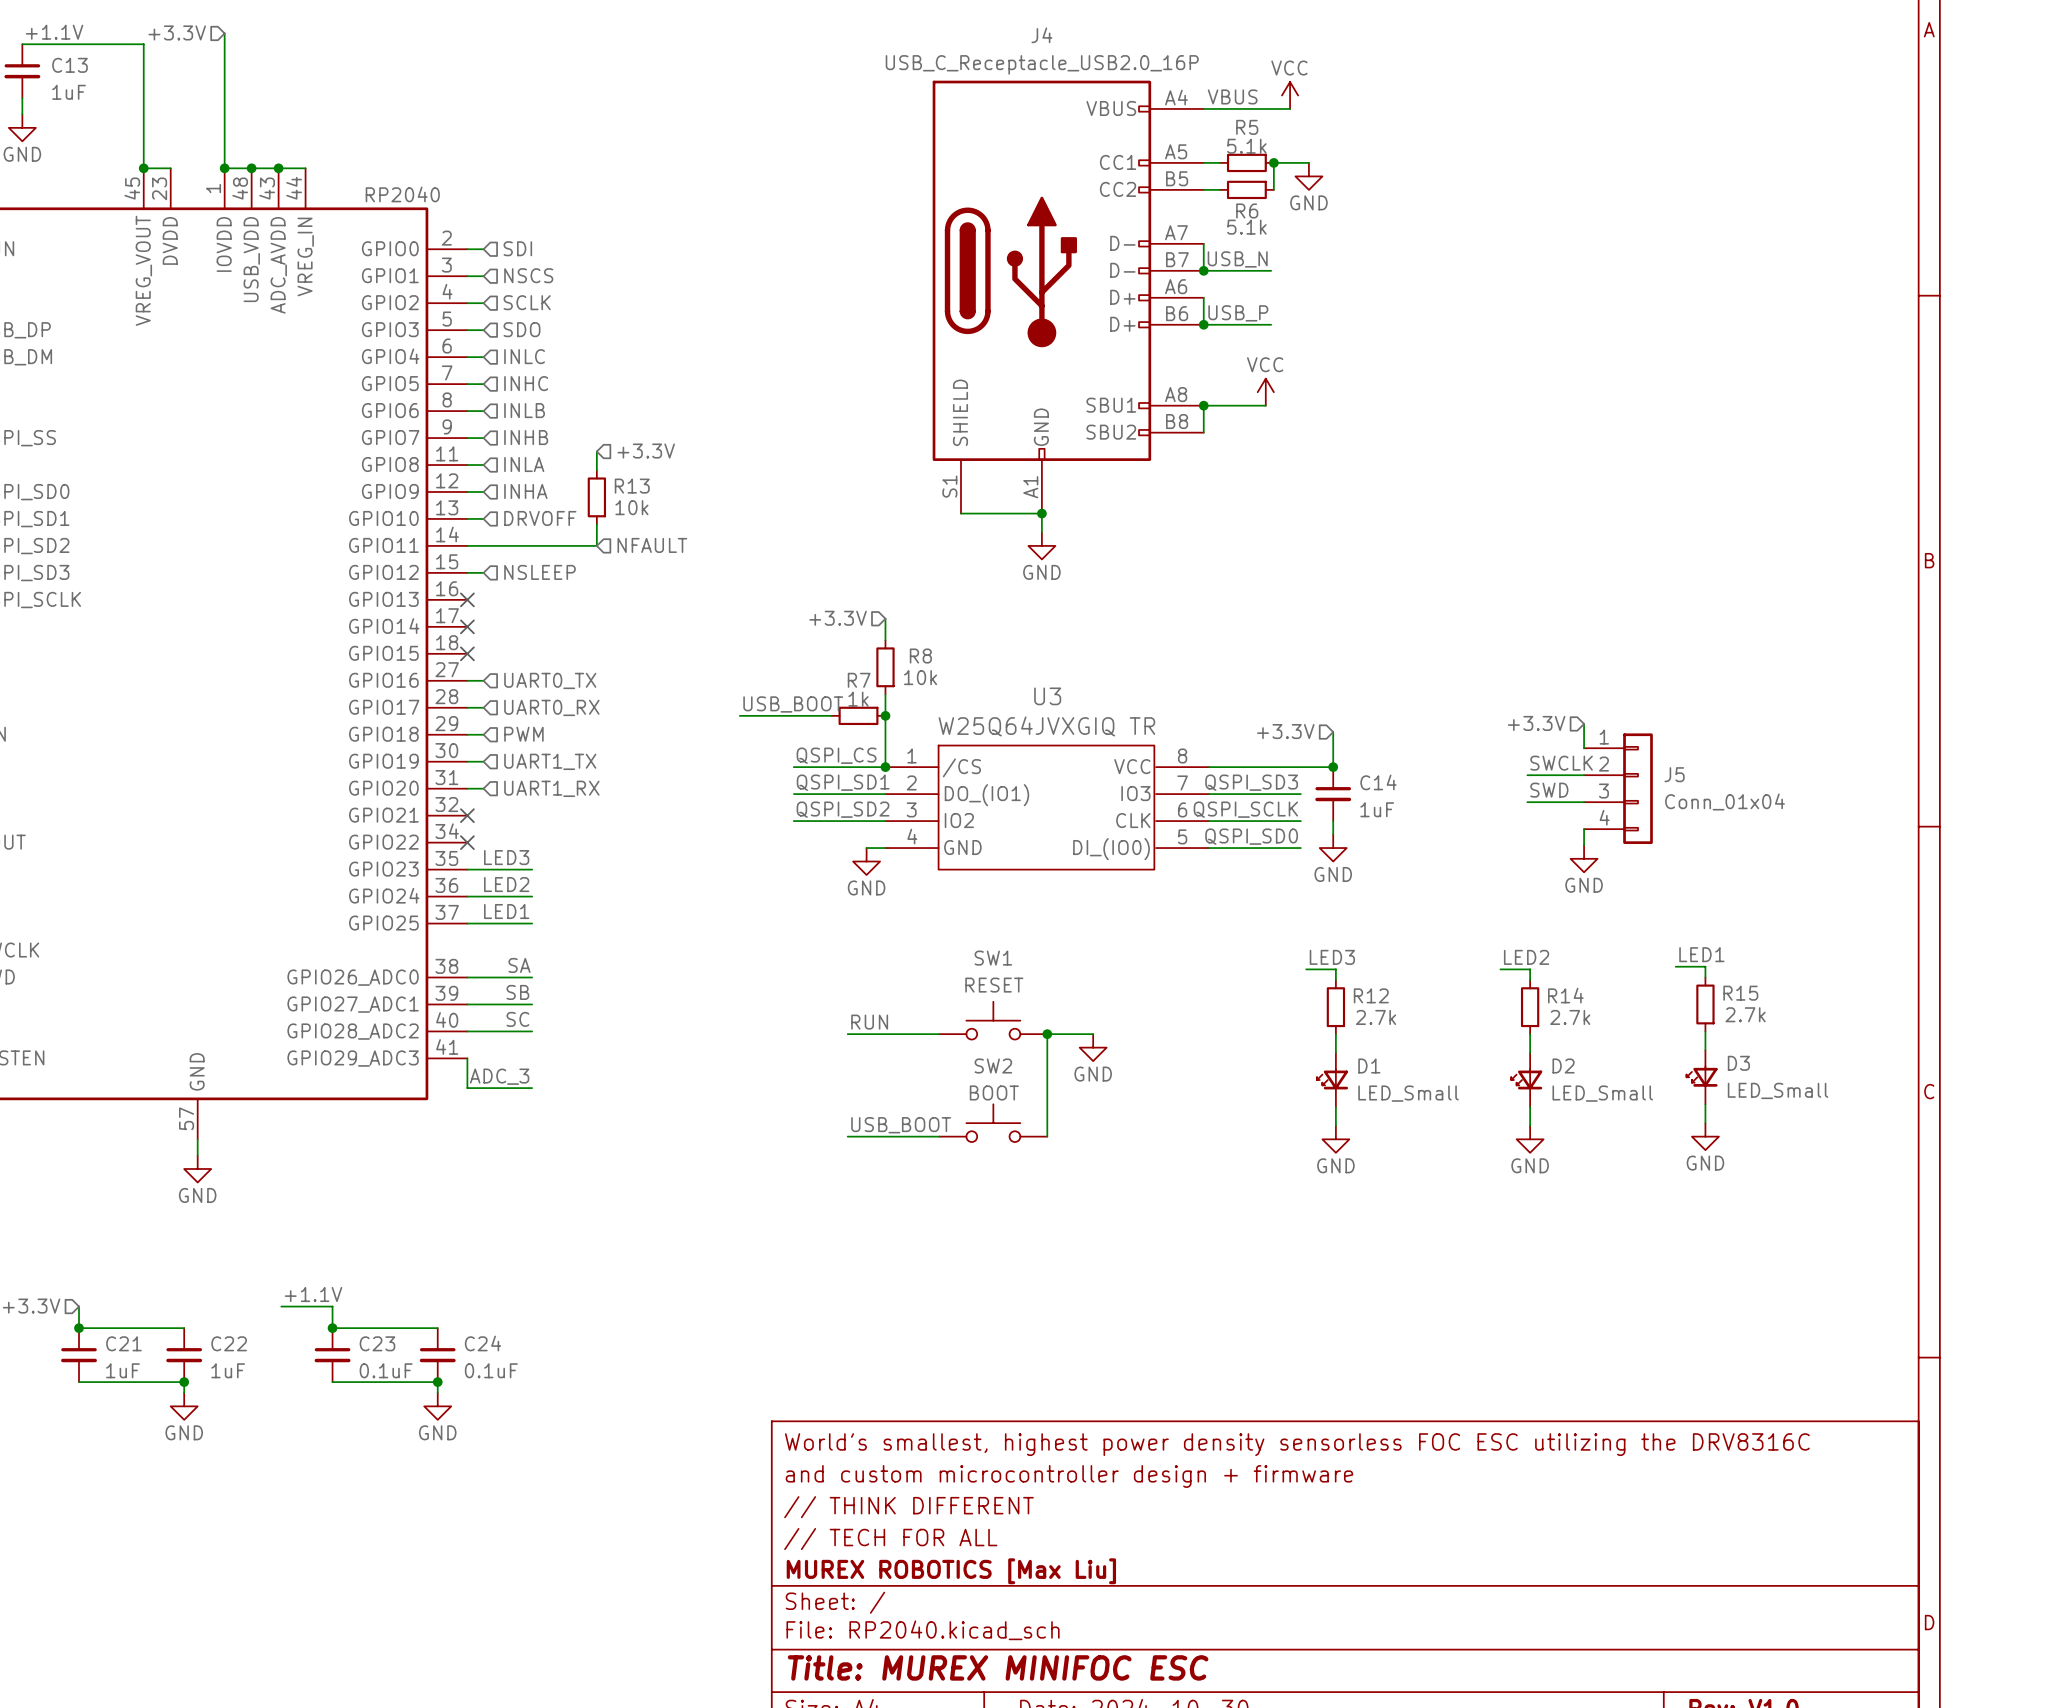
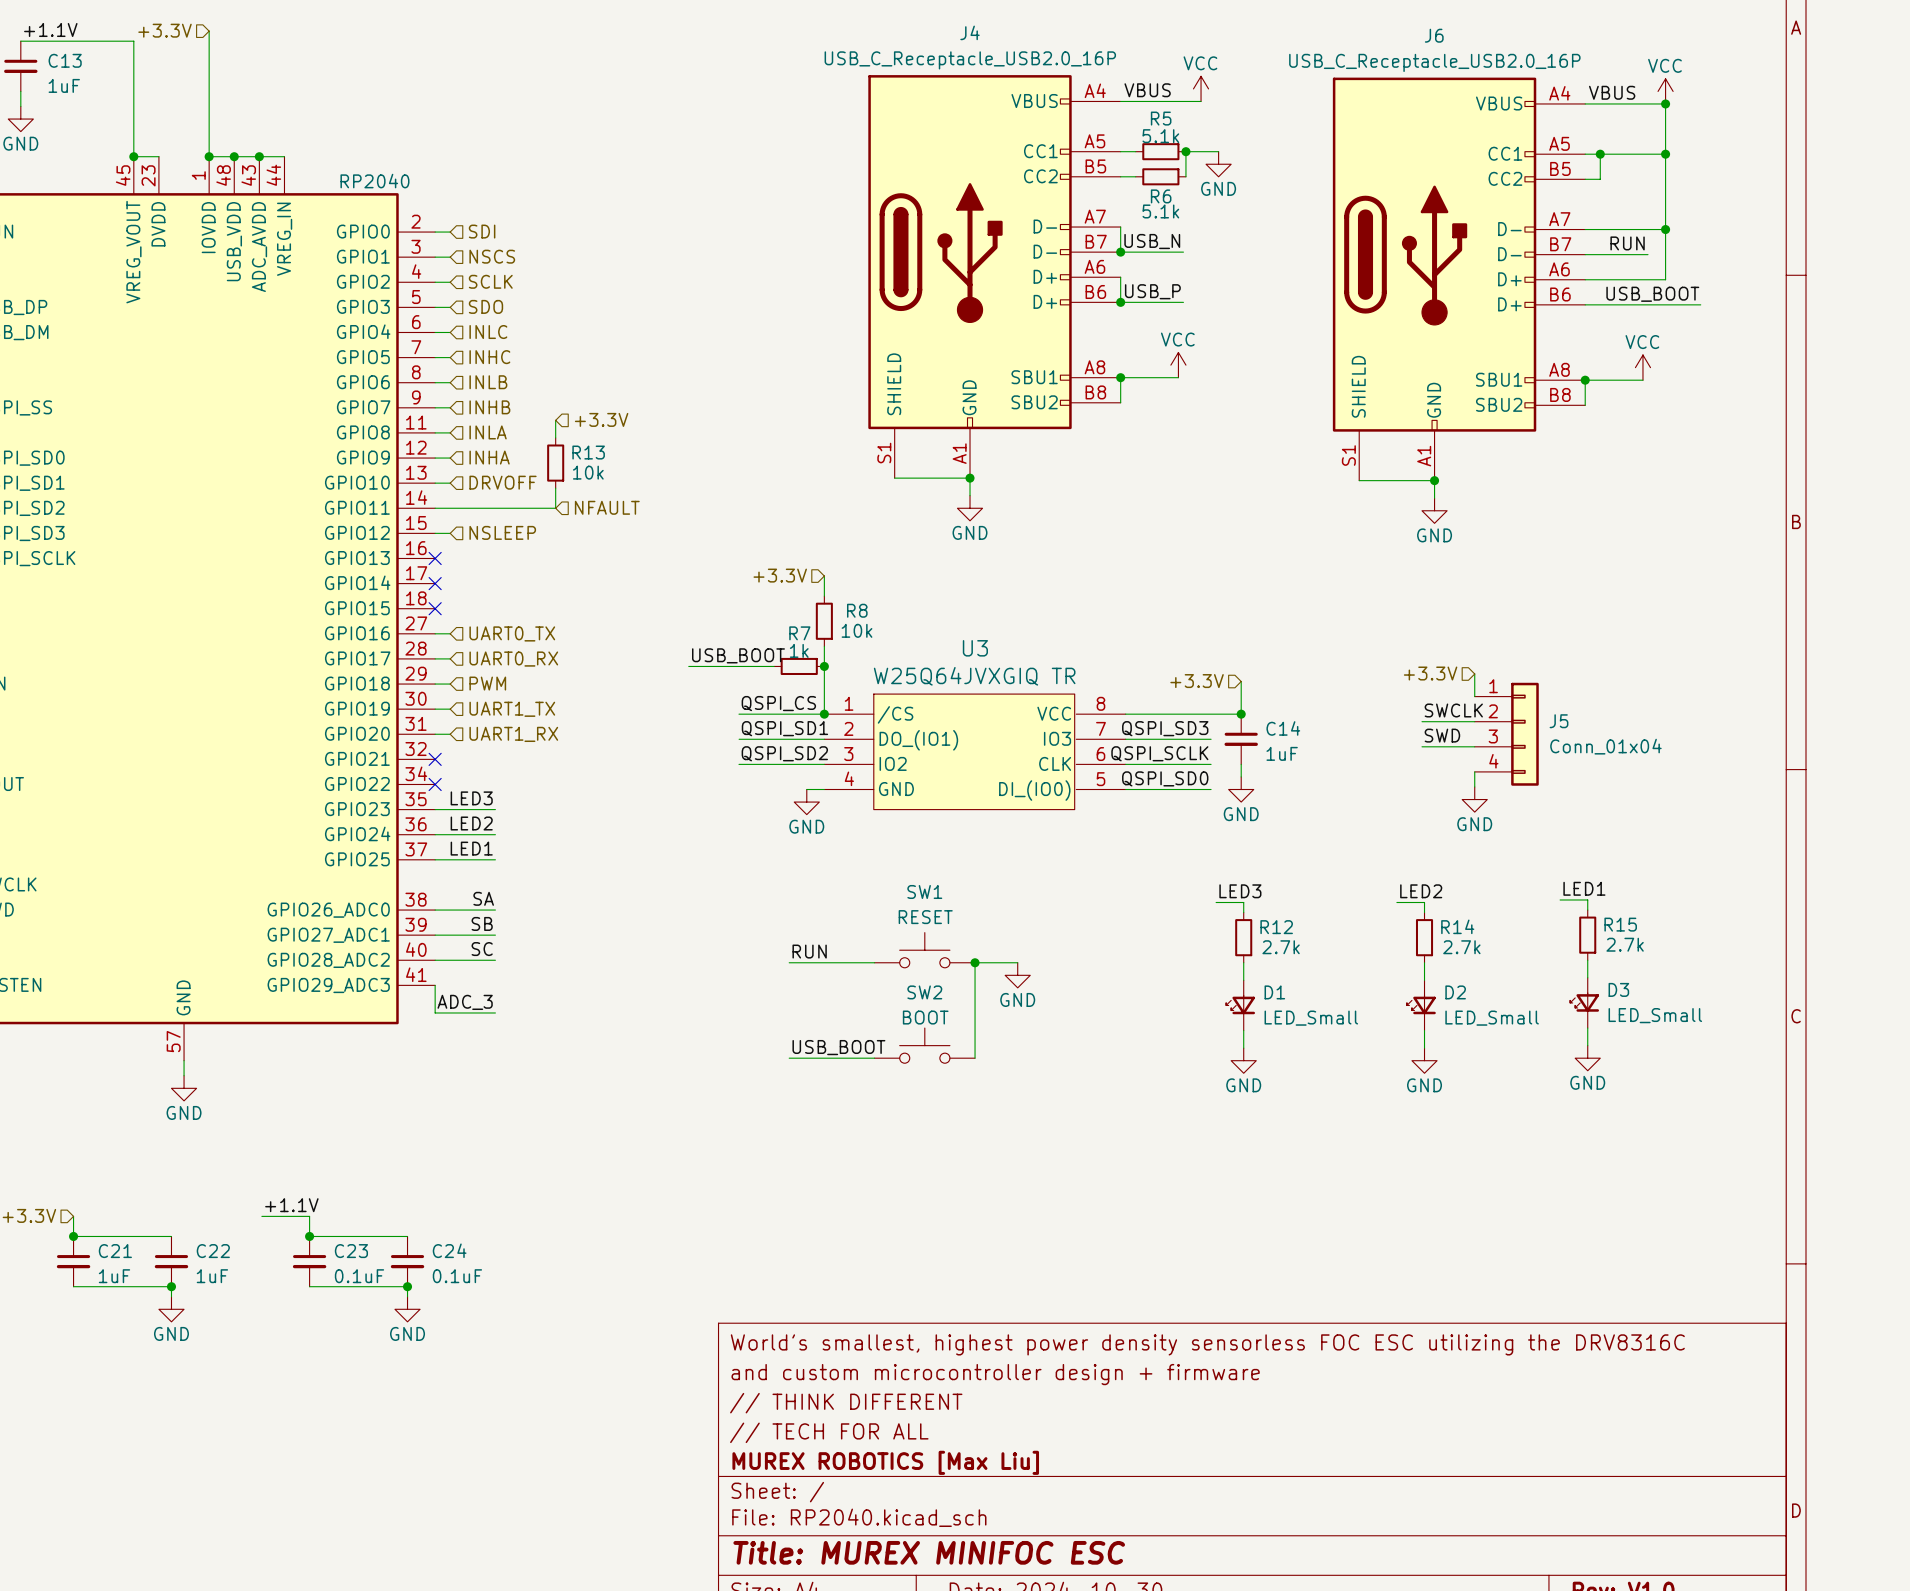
power symbol: none -> VCC (1665, 91)
label: none -> VBUS (1612, 92)
wire: none -> (1585, 103) (1665, 103) (1665, 279) (1585, 279)
junction: none -> (1665, 103)
wire: none -> (1585, 154) (1665, 154)
wire: none -> (1600, 154) (1600, 179) (1585, 179)
junction: none -> (1600, 154)
junction: none -> (1665, 154)
wire: none -> (1585, 229) (1665, 229)
junction: none -> (1665, 229)
label: none -> RUN (1627, 243)
wire: none -> (1585, 254) (1648, 254)
J6: none -> USB_C_Receptacle_USB2.0_16P (1459, 279)
label: none -> USB_BOOT (1652, 294)
wire: none -> (1585, 304) (1700, 304)
power symbol: none -> VCC (1642, 367)
junction: none -> (1585, 380)
wire: none -> (1642, 380) (1585, 380) (1585, 405)
wire: none -> (1359, 480) (1434, 480) (1434, 498)
junction: none -> (1434, 480)
power symbol: none -> GND (1434, 510)

